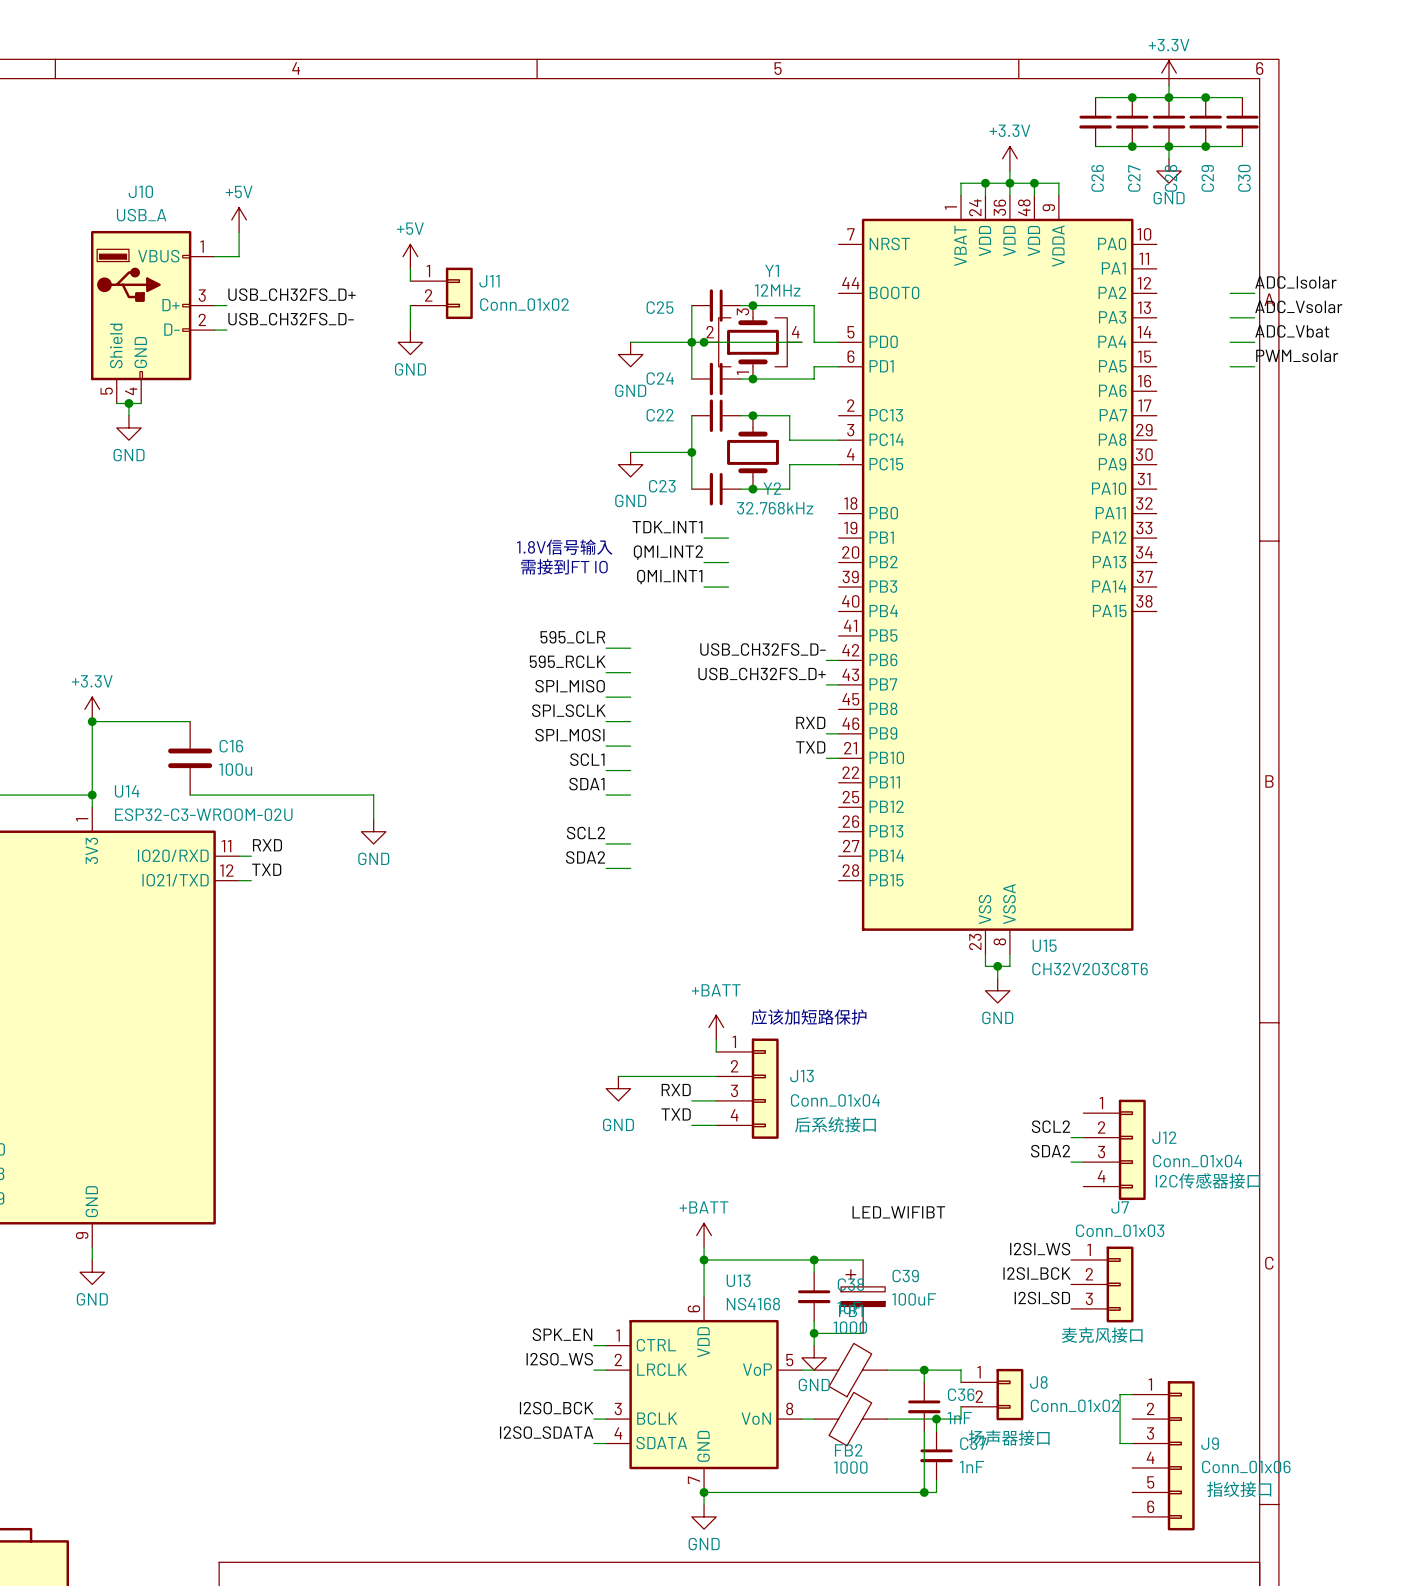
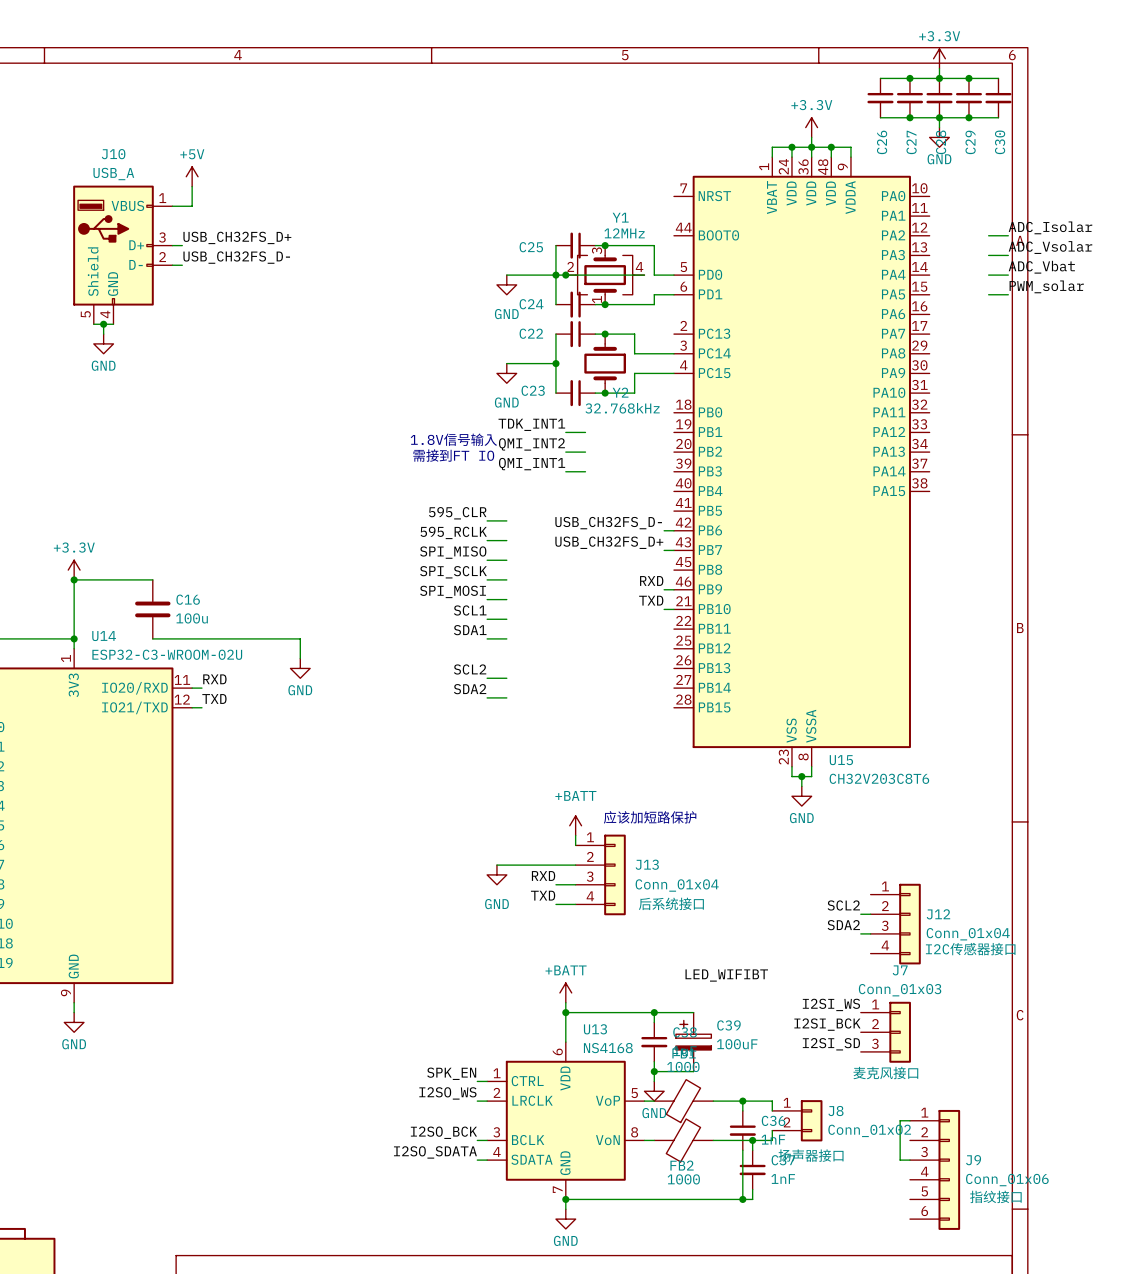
power symbol: +5V (410, 256) -> none
wire: (410, 268) (410, 281) -> none
J11: Conn_01x02 (441, 293) -> none
wire: (410, 305) (410, 330) -> none
power symbol: GND (410, 342) -> none

